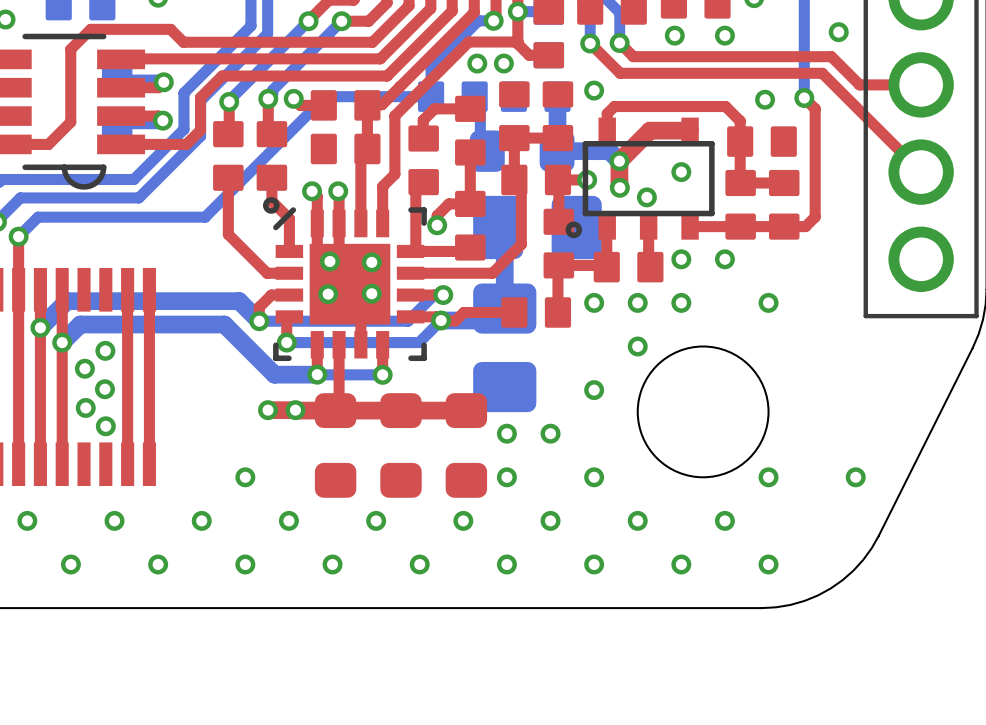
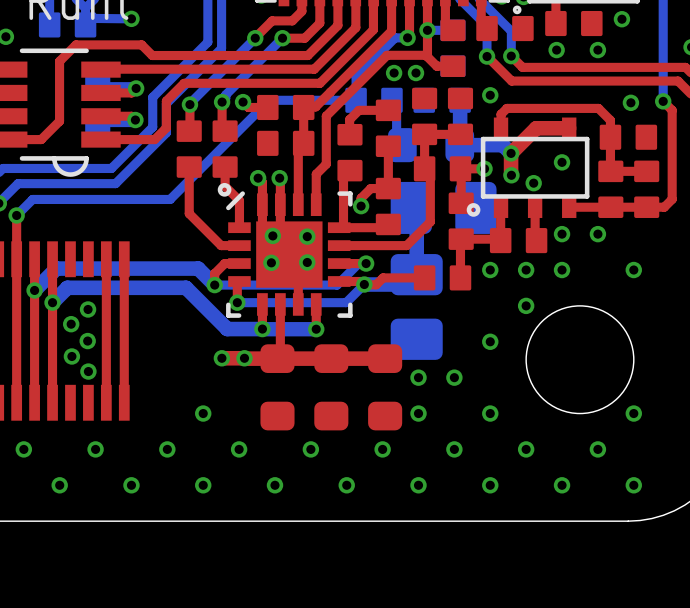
bottom track width: thin (317, 374) (382, 374) -> thick (262, 329) (316, 329)

